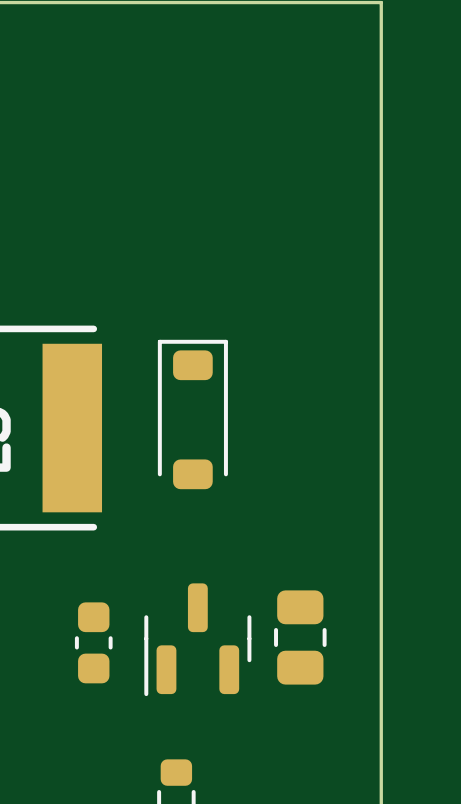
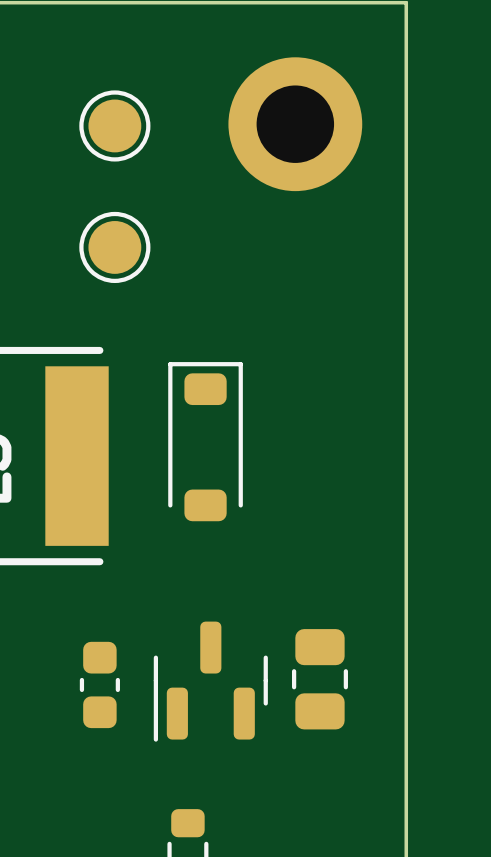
part: none -> (295, 124)
part: none -> (114, 125)
part: none -> (114, 247)

